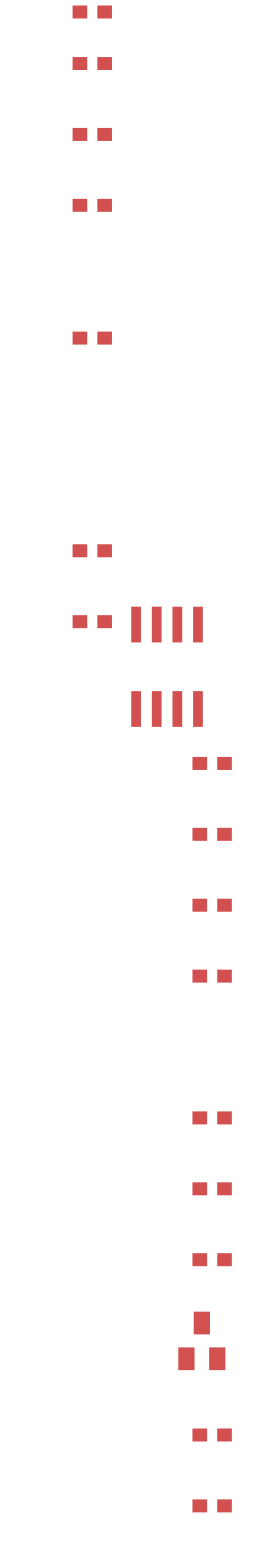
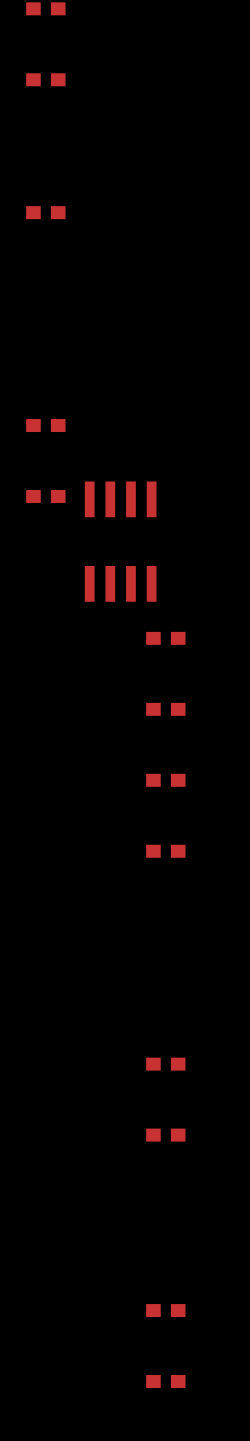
part: (212, 1117) -> none
part: (201, 1340) -> none

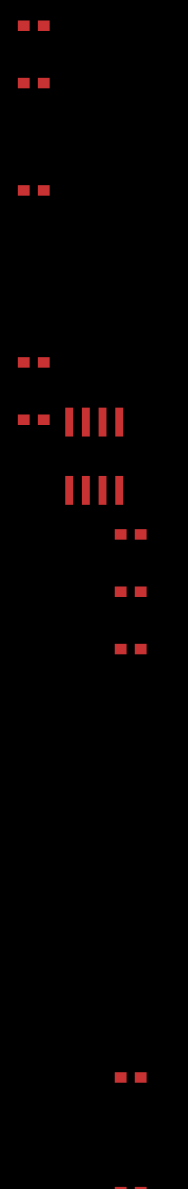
part: (165, 851) -> none
part: (165, 1064) -> none
part: (165, 1135) -> none
part: (165, 1381) -> none

